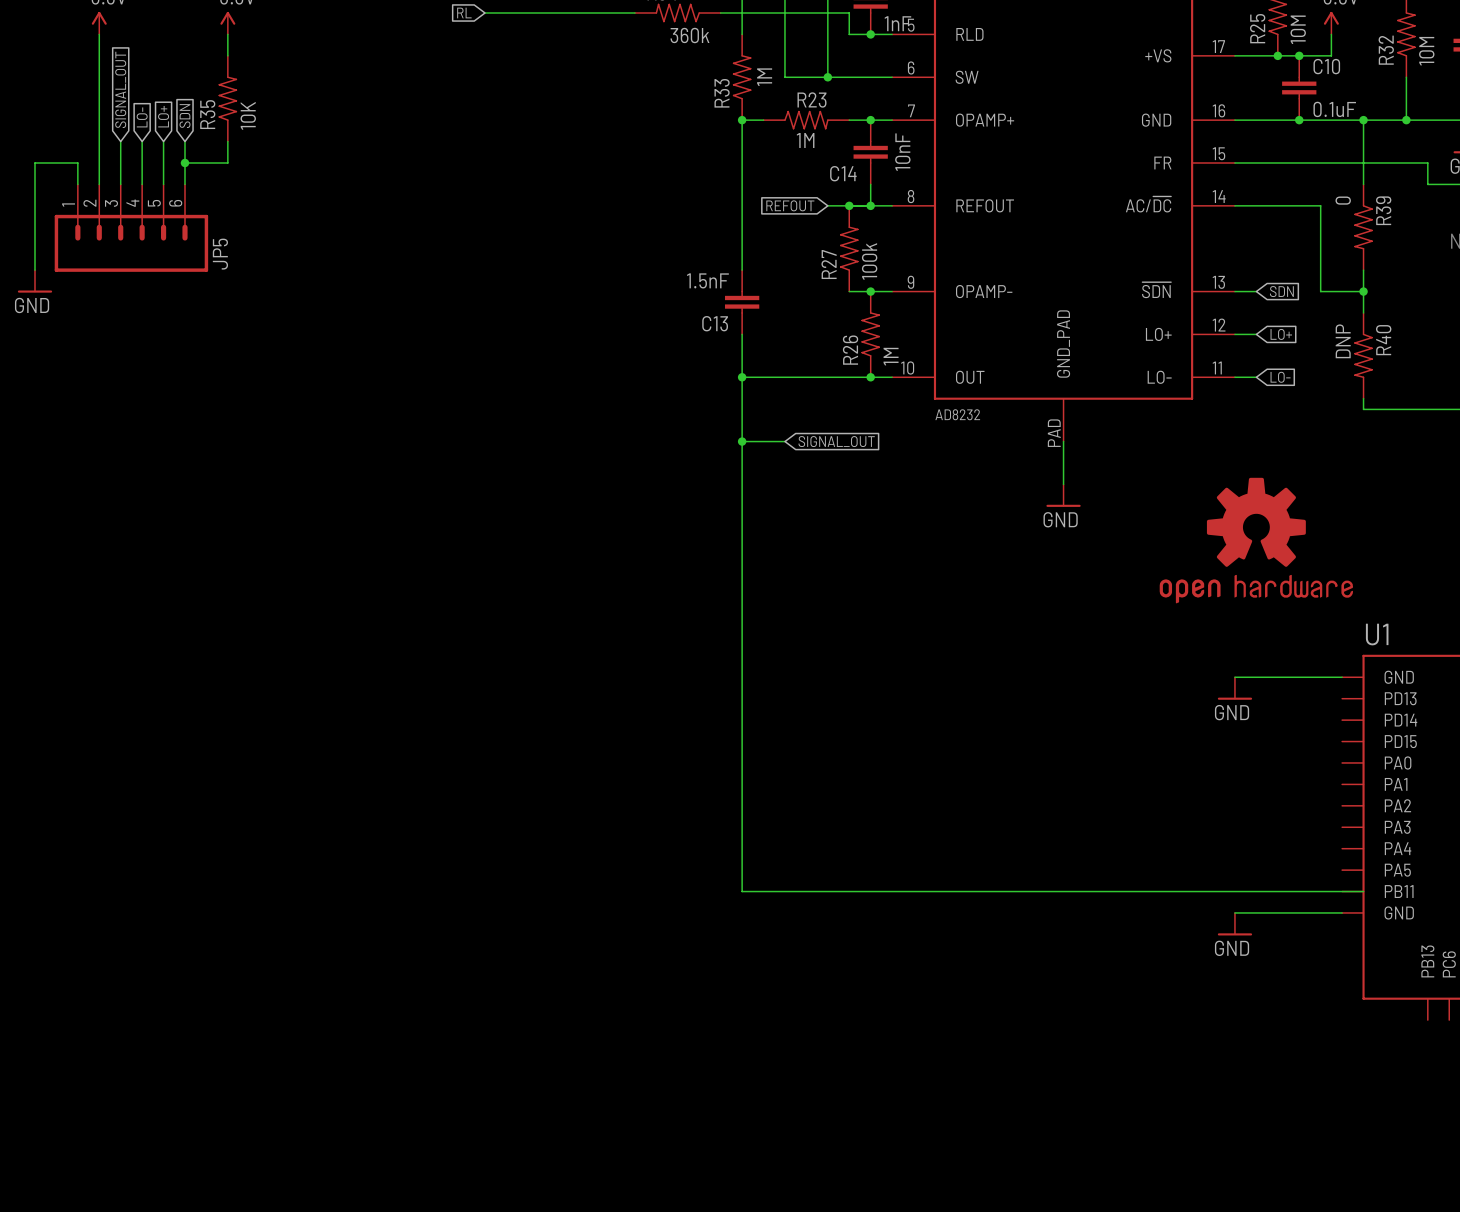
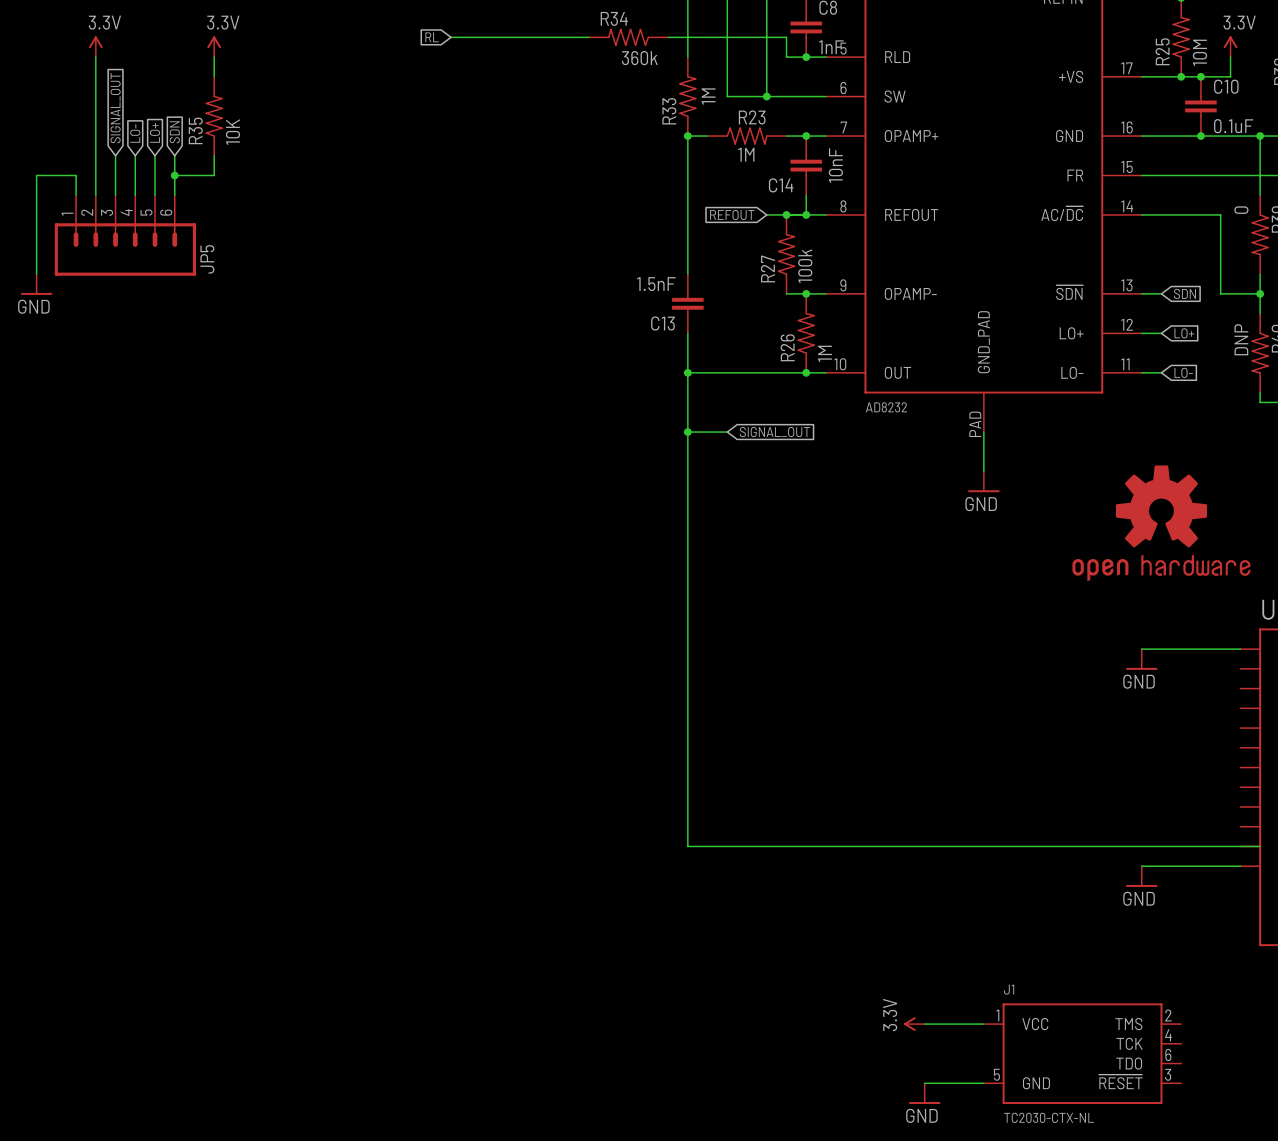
power symbol: none -> 3.3V (914, 1024)
wire: none -> (924, 1024) (983, 1024)
J1: none -> TC2030-CTX-NL (1082, 1053)
wire: none -> (924, 1083) (983, 1083)
power symbol: none -> GND (924, 1093)

